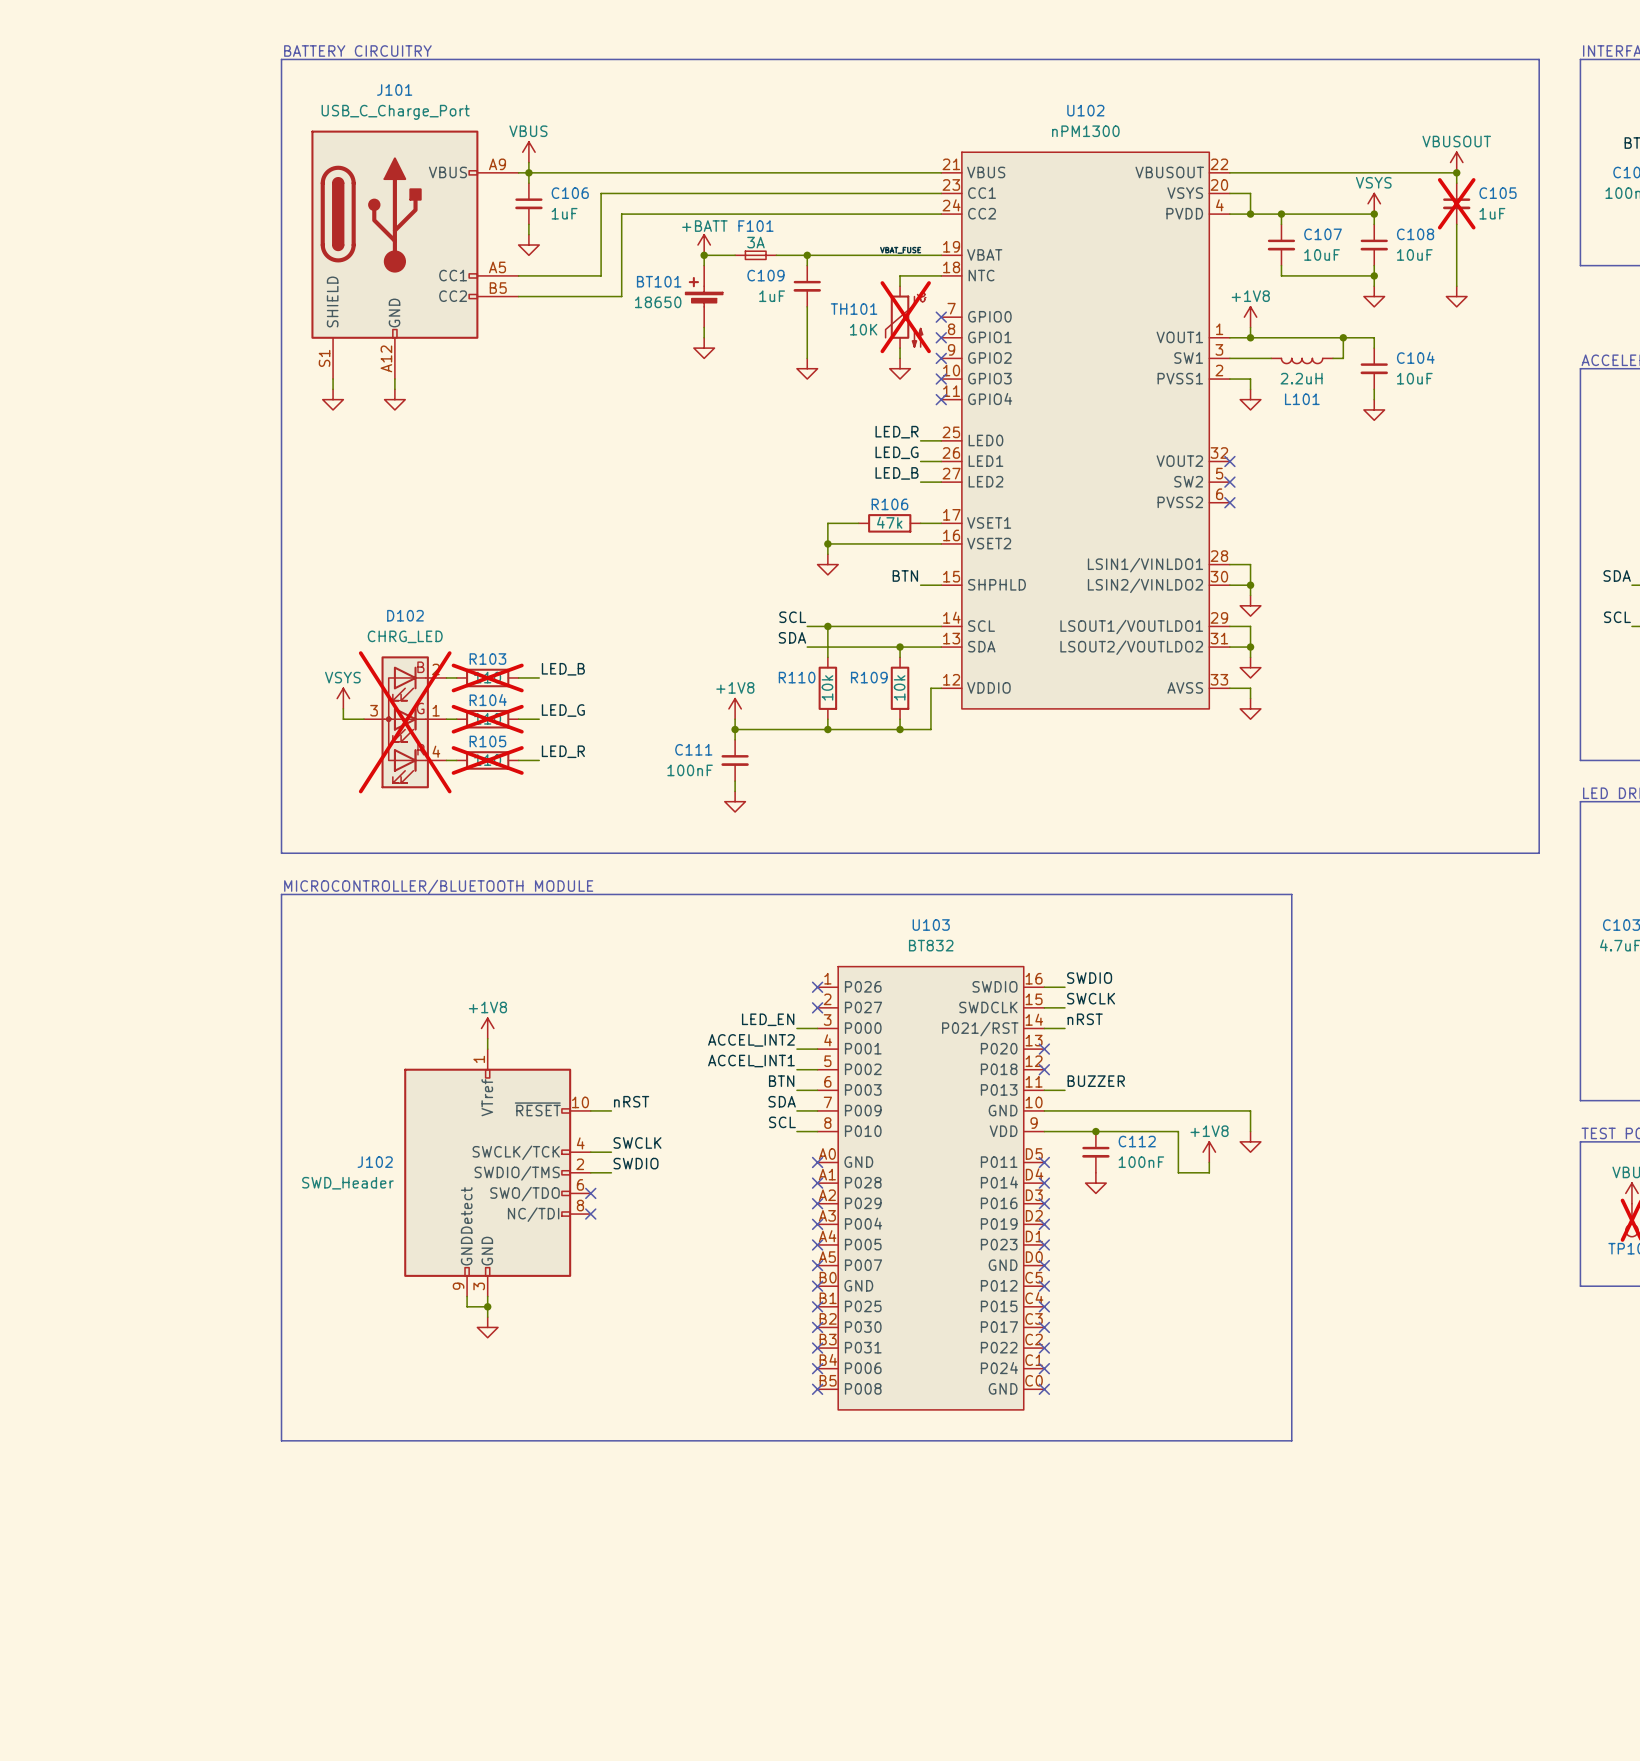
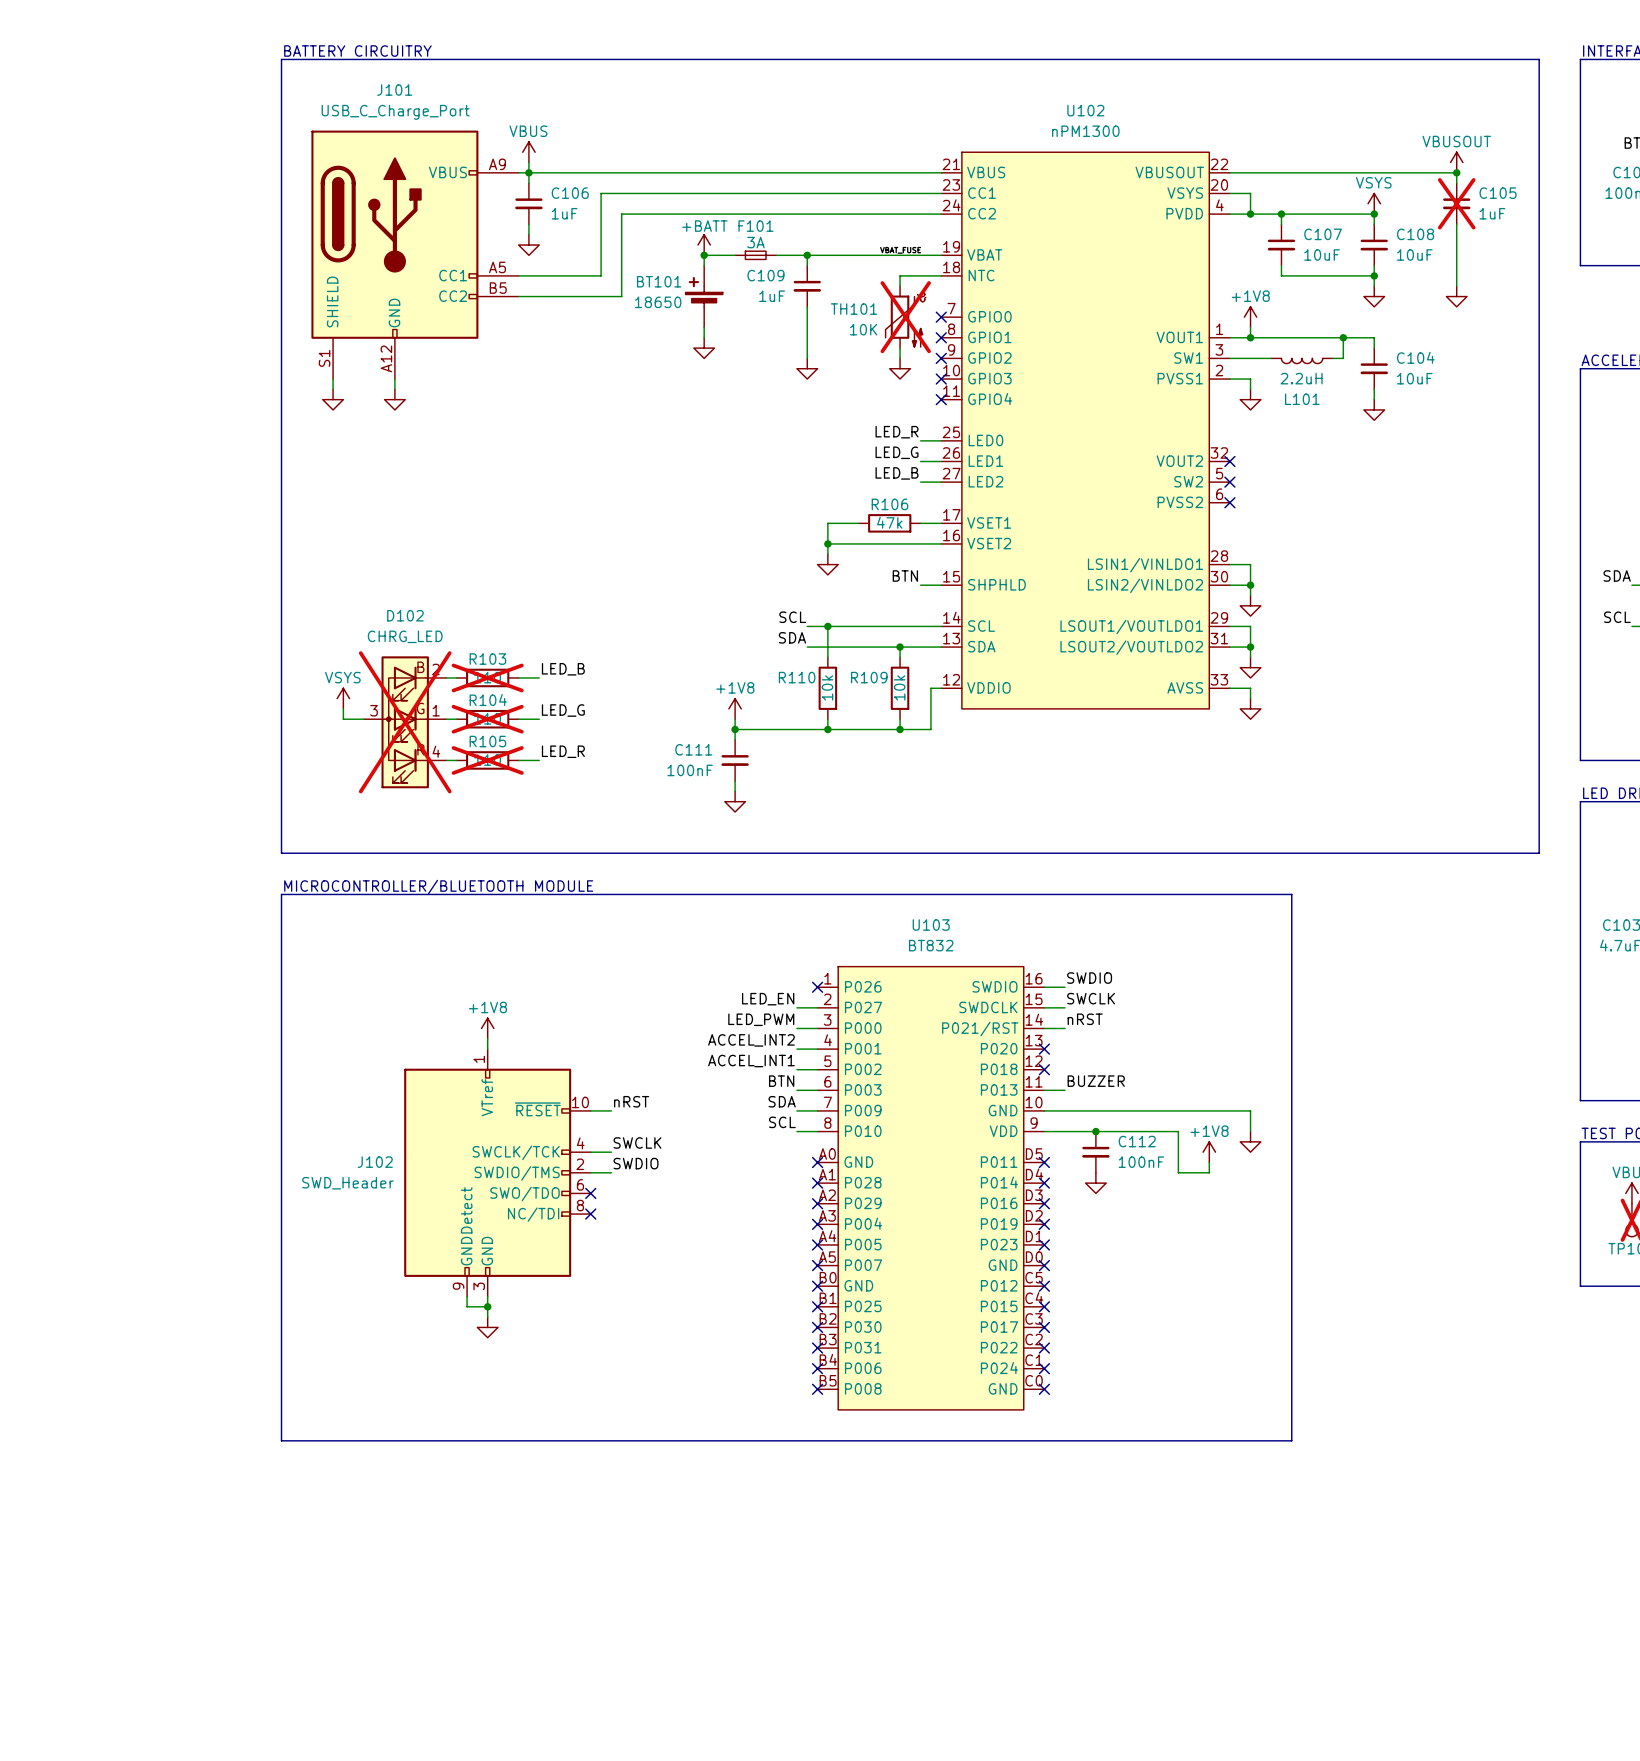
label: none -> LED_EN (768, 999)
wire: none -> (796, 1007) (817, 1007)
no-connect mark: (817, 1007) -> none
label: LED_EN (768, 1019) -> LED_PWM (761, 1019)

